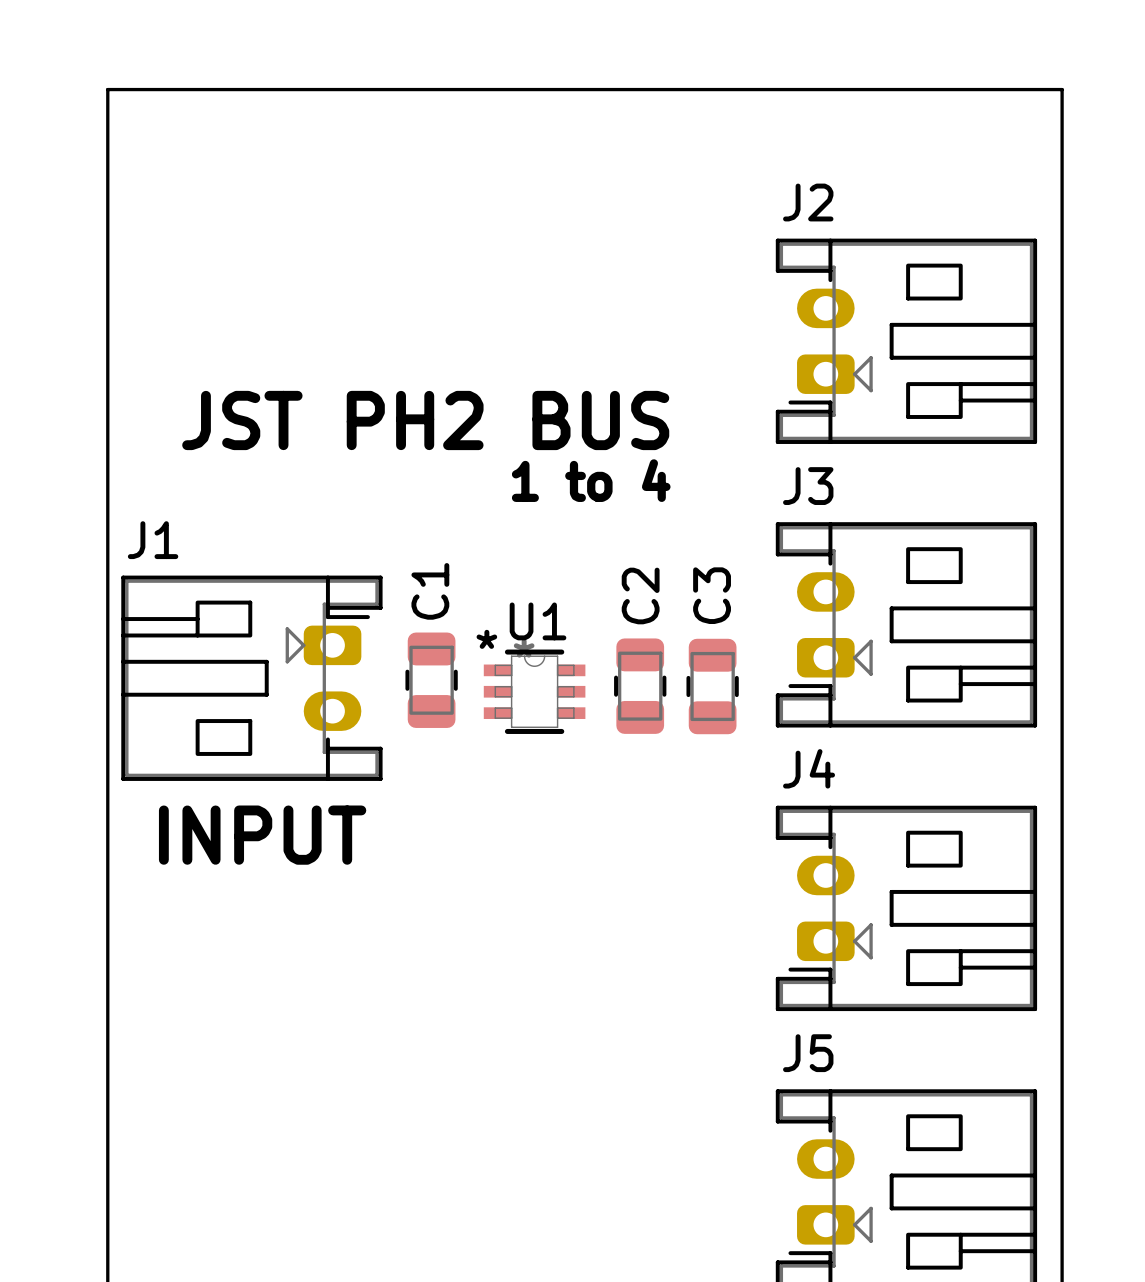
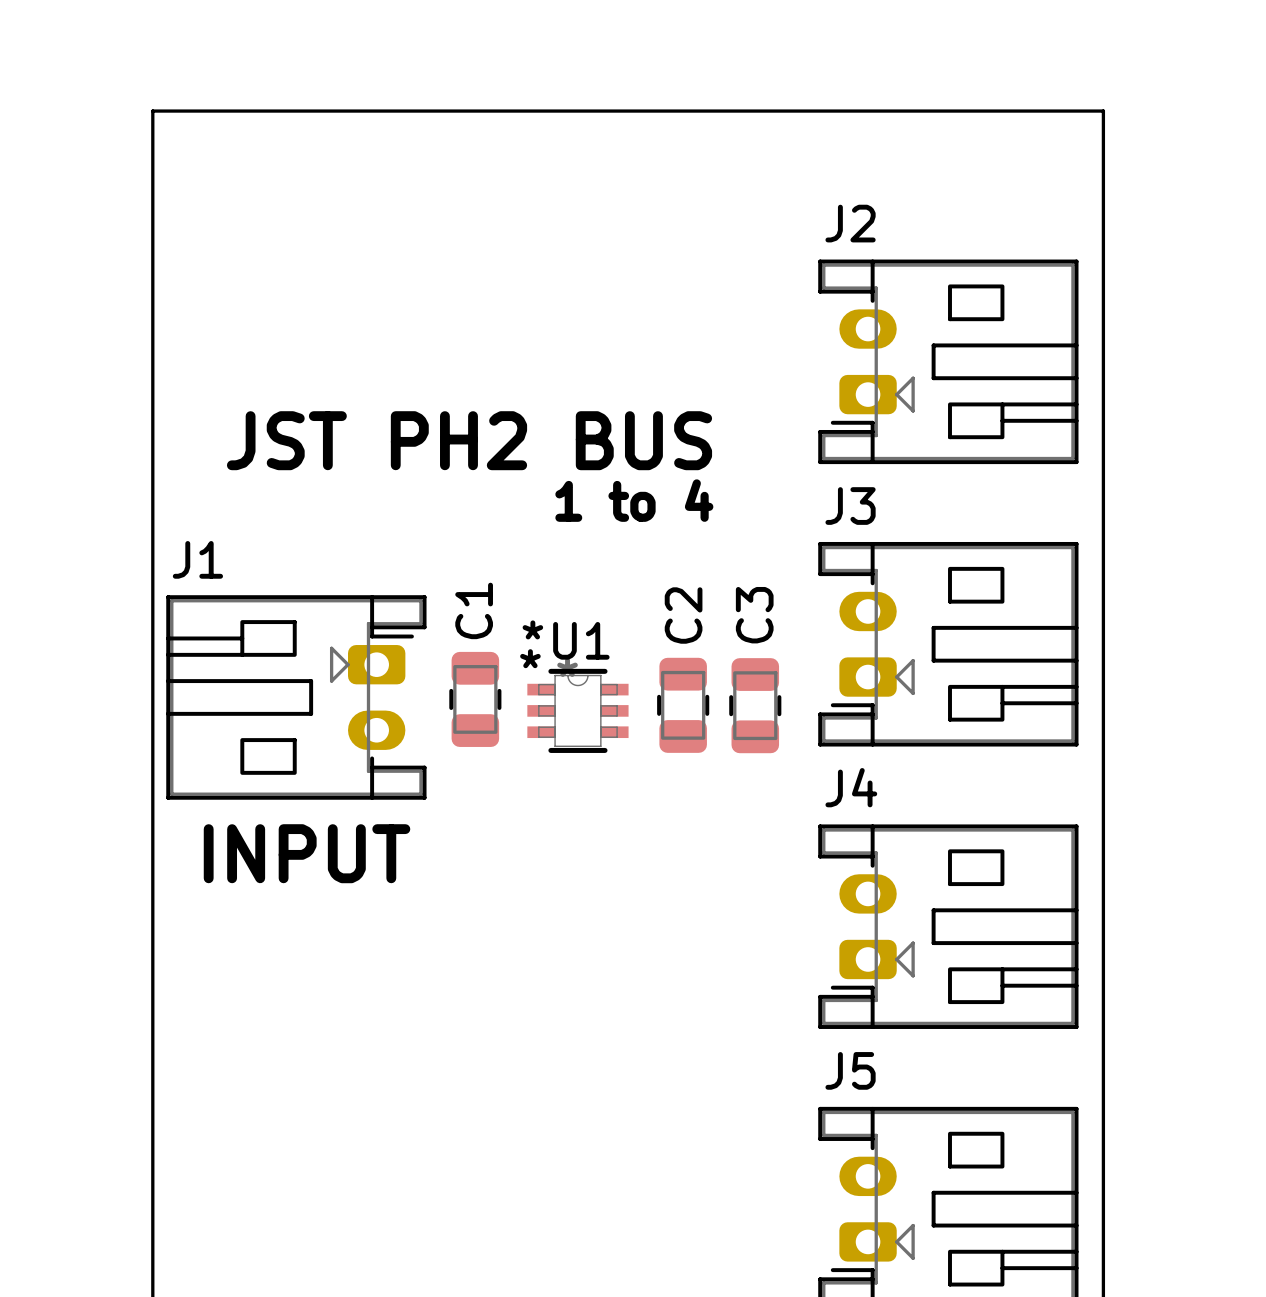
U1 text: none -> * (532, 629)

